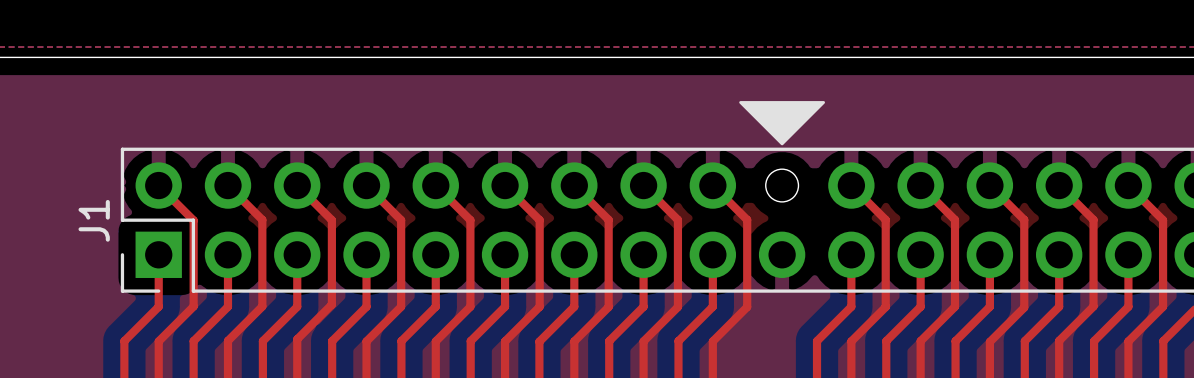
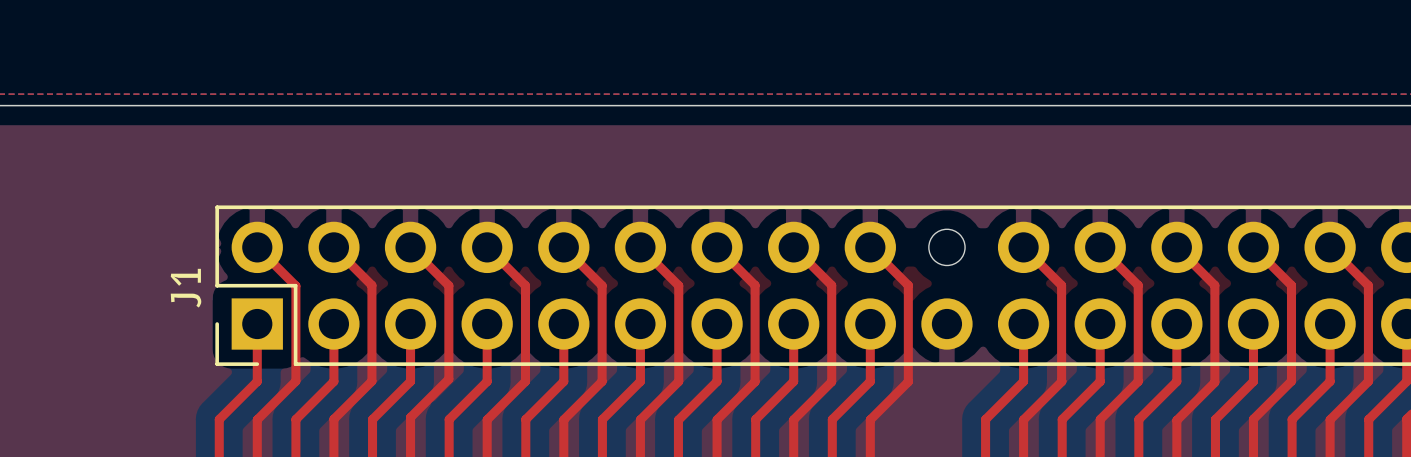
drawing: [739, 101, 826, 146] -> none

